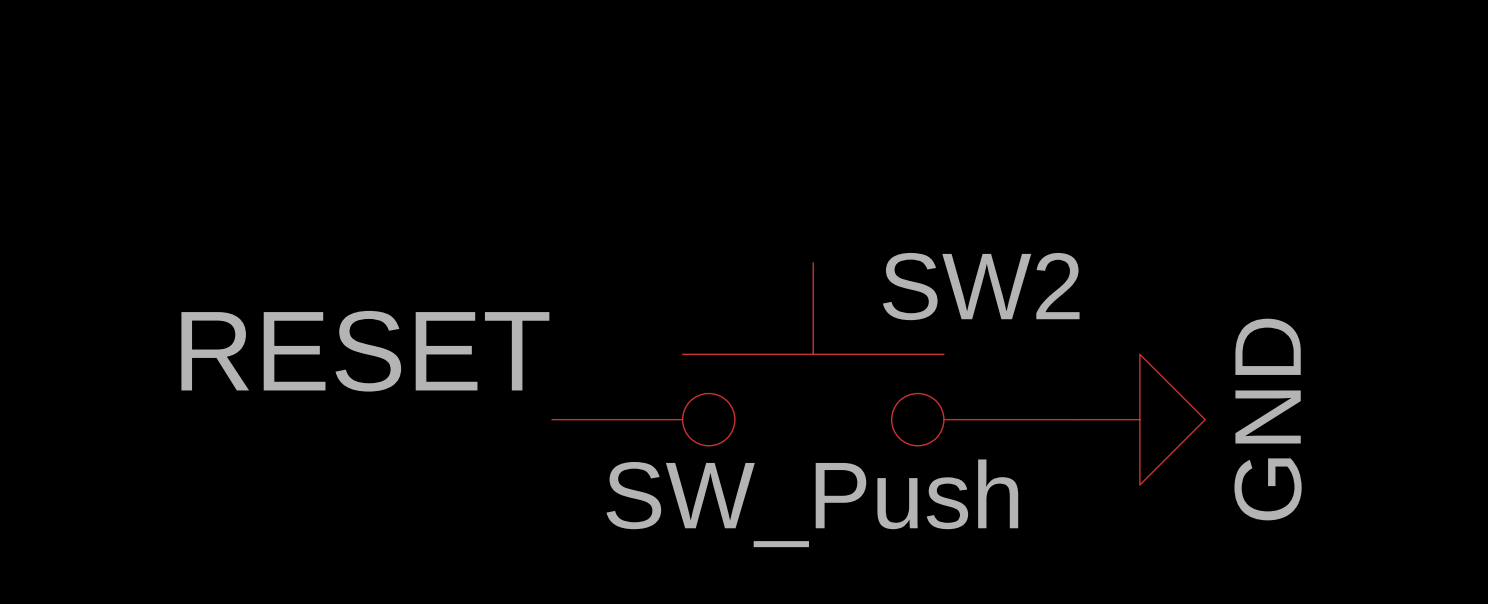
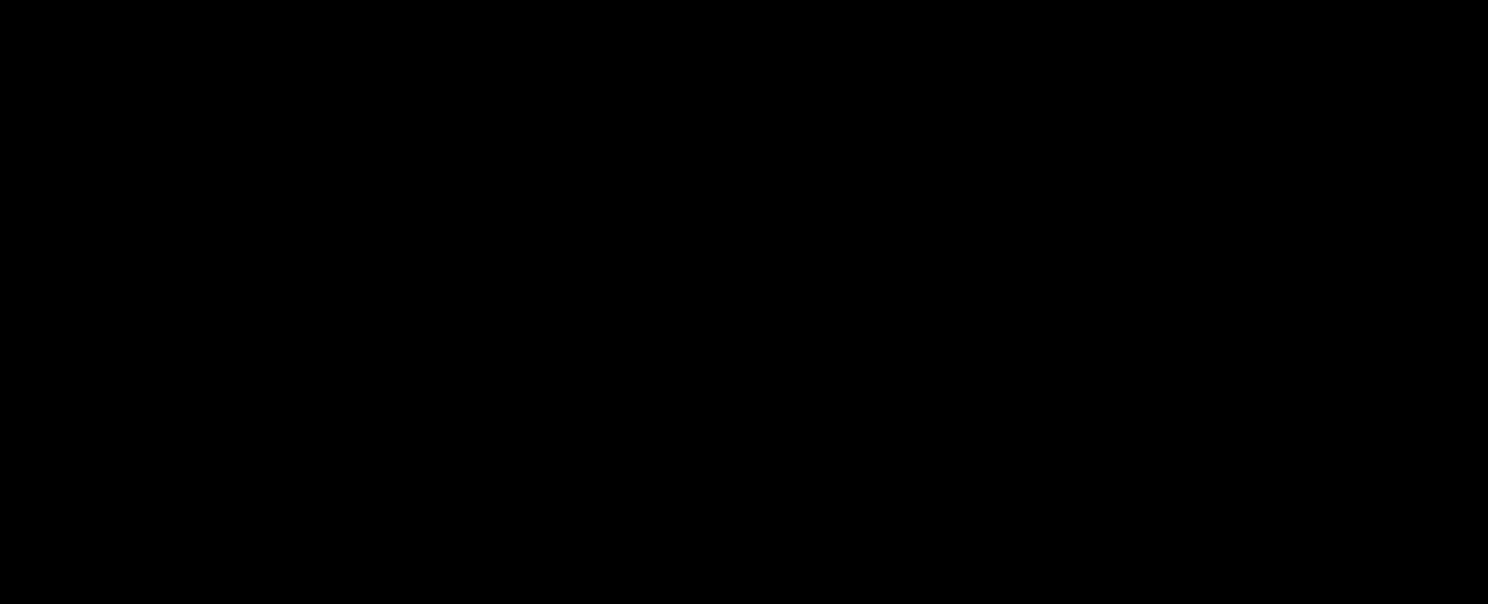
label: RESET (365, 351) -> none
SW2: SW_Push (813, 354) -> none
power symbol: GND (1139, 419) -> none

